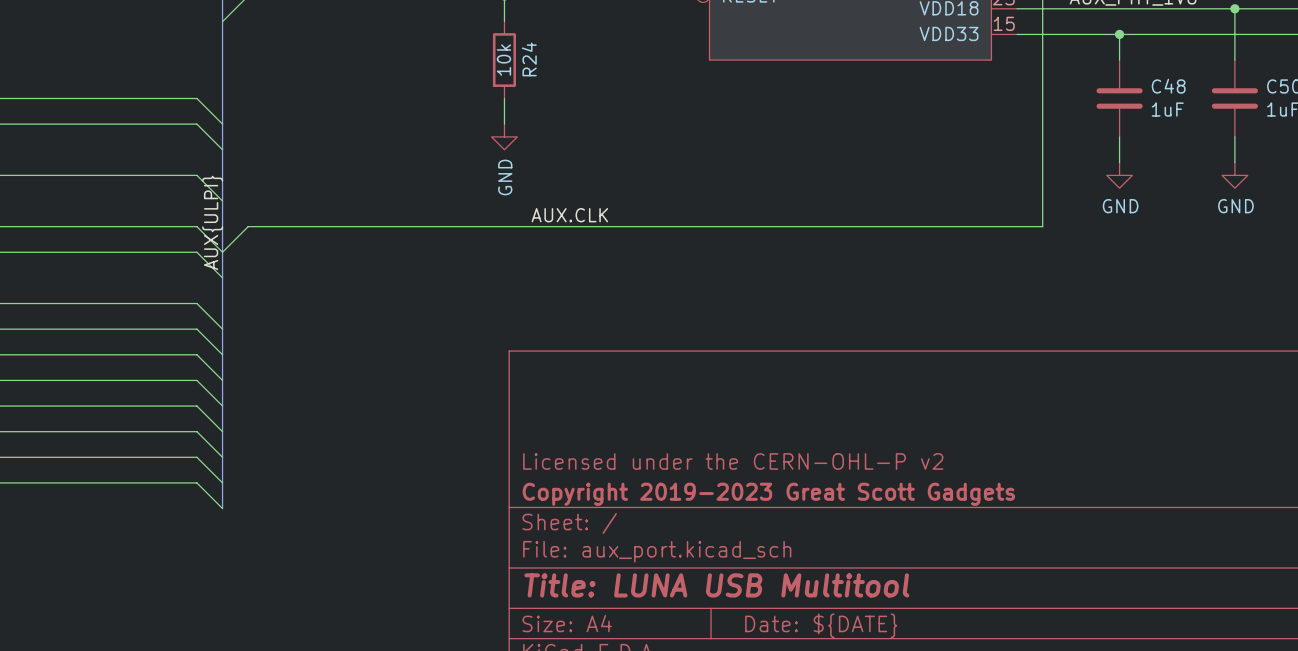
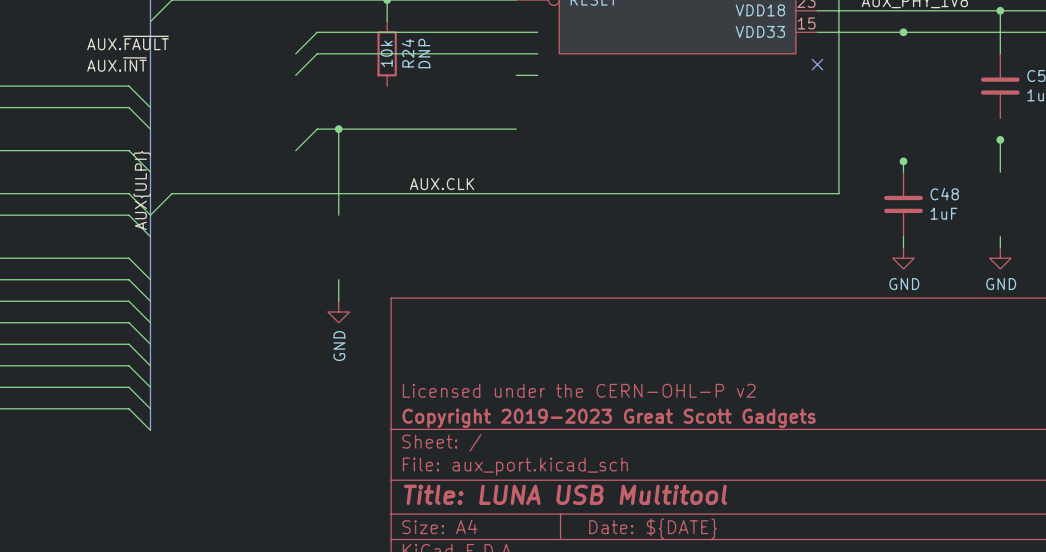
wire: none -> (537, 32) (317, 32) (295, 53)
wire: (1119, 34) (1119, 60) -> none
label: none -> AUX.~{FAULT} (128, 42)
R24 text: none -> DNP (424, 53)
wire: none -> (537, 53) (317, 53) (295, 75)
label: none -> AUX.~{INT} (117, 64)
no-connect mark: none -> (817, 64)
wire: none -> (516, 75) (537, 75)
wire: (504, 98) (504, 124) -> (338, 279) (338, 301)
C48 position: (1119, 98) -> (903, 204)
power symbol position: GND (504, 136) -> GND (338, 312)
wire: (1119, 136) (1119, 162) -> none
wire: (1234, 136) (1234, 162) -> (1000, 172) (1000, 139)
wire: none -> (338, 129) (338, 215)
junction: none -> (338, 129)
wire: none -> (516, 129) (317, 129) (295, 150)
junction: none -> (1000, 139)
power symbol: GND (1119, 175) -> none
power symbol: GND (1234, 175) -> none
wire: none -> (903, 161) (903, 172)
junction: none -> (903, 161)
wire: none -> (903, 236) (903, 247)
wire: none -> (1000, 236) (1000, 247)
power symbol: none -> GND (903, 258)
power symbol: none -> GND (1000, 258)

